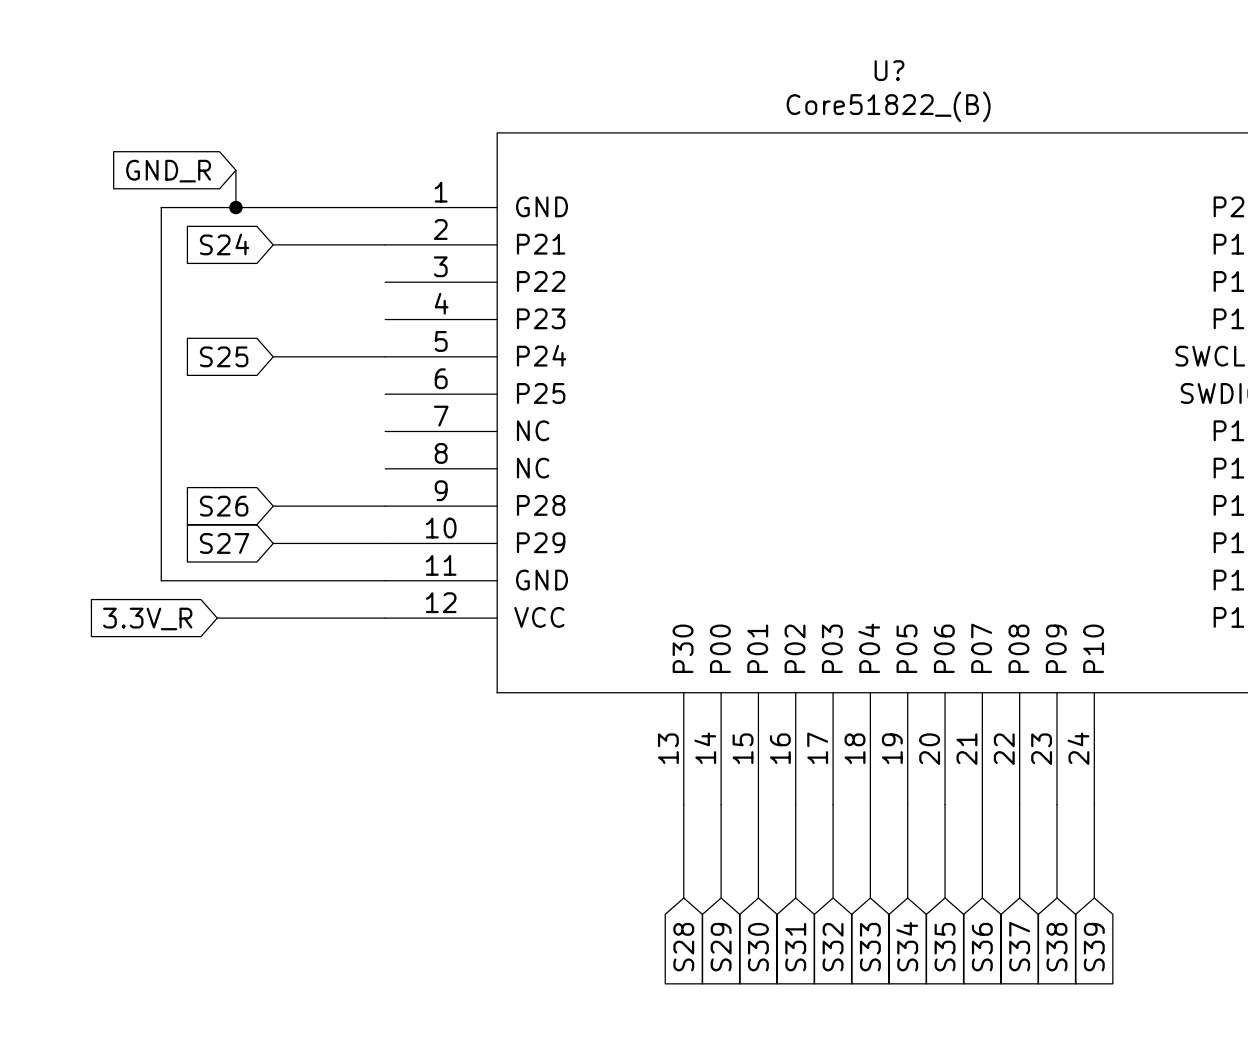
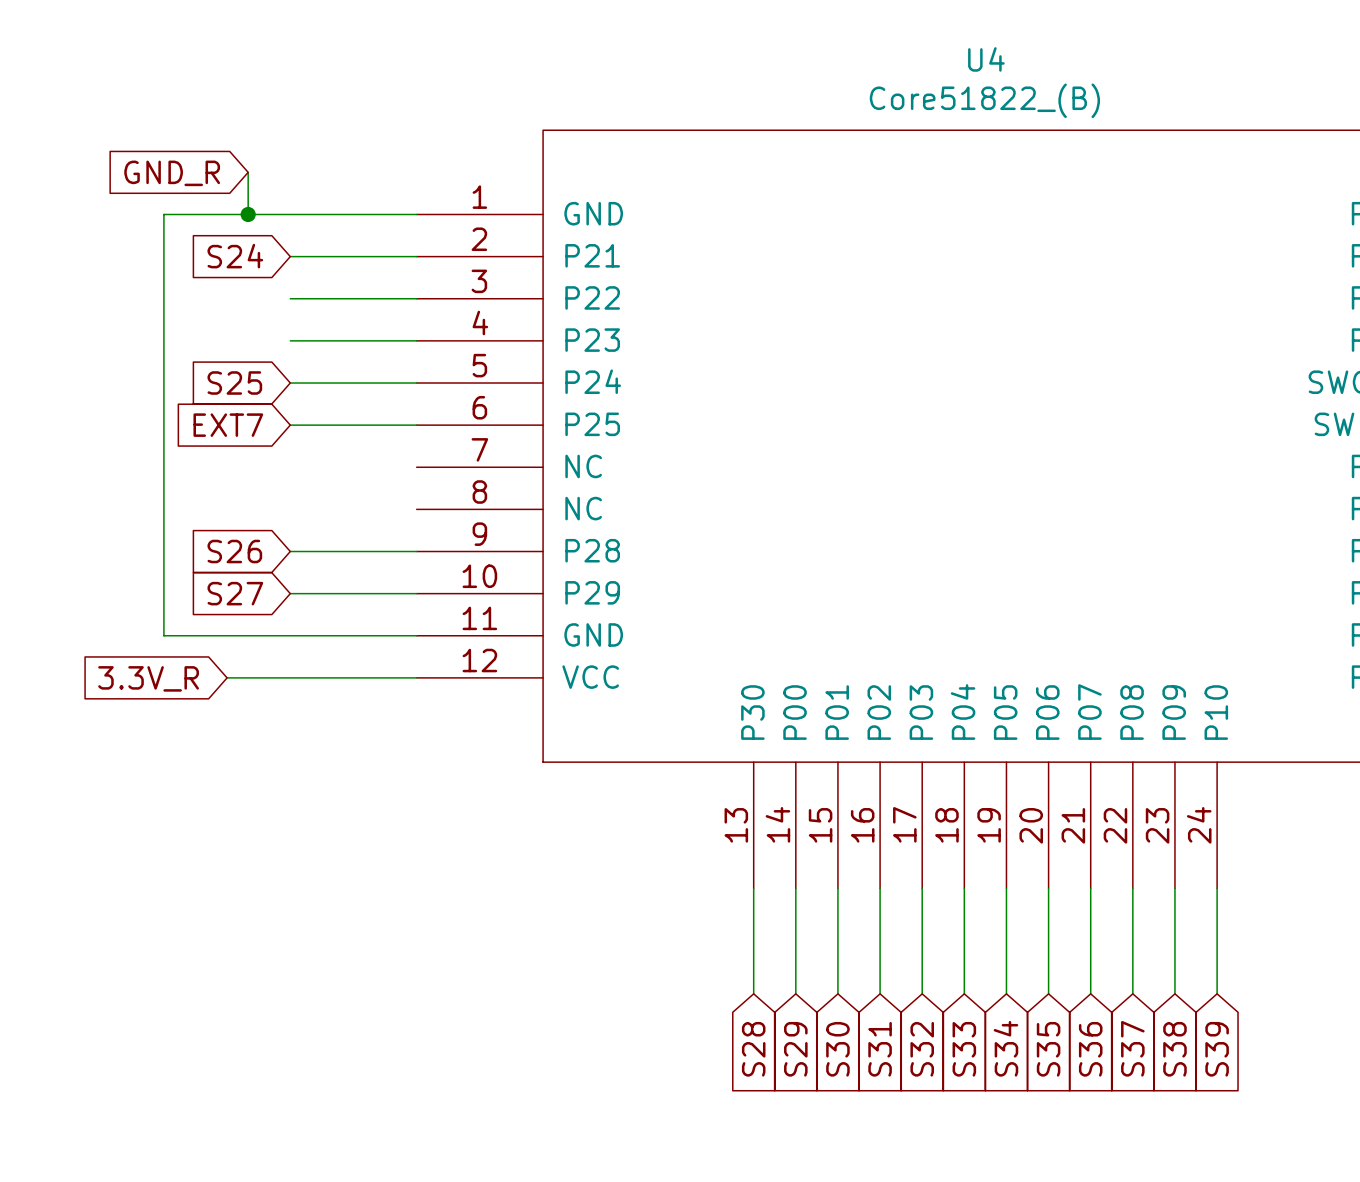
U? name: U? (889, 70) -> U4 (986, 59)
wire: none -> (290, 298) (416, 298)
wire: none -> (290, 340) (416, 340)
global label: none -> EXT7 (228, 425)
wire: none -> (290, 425) (416, 425)

